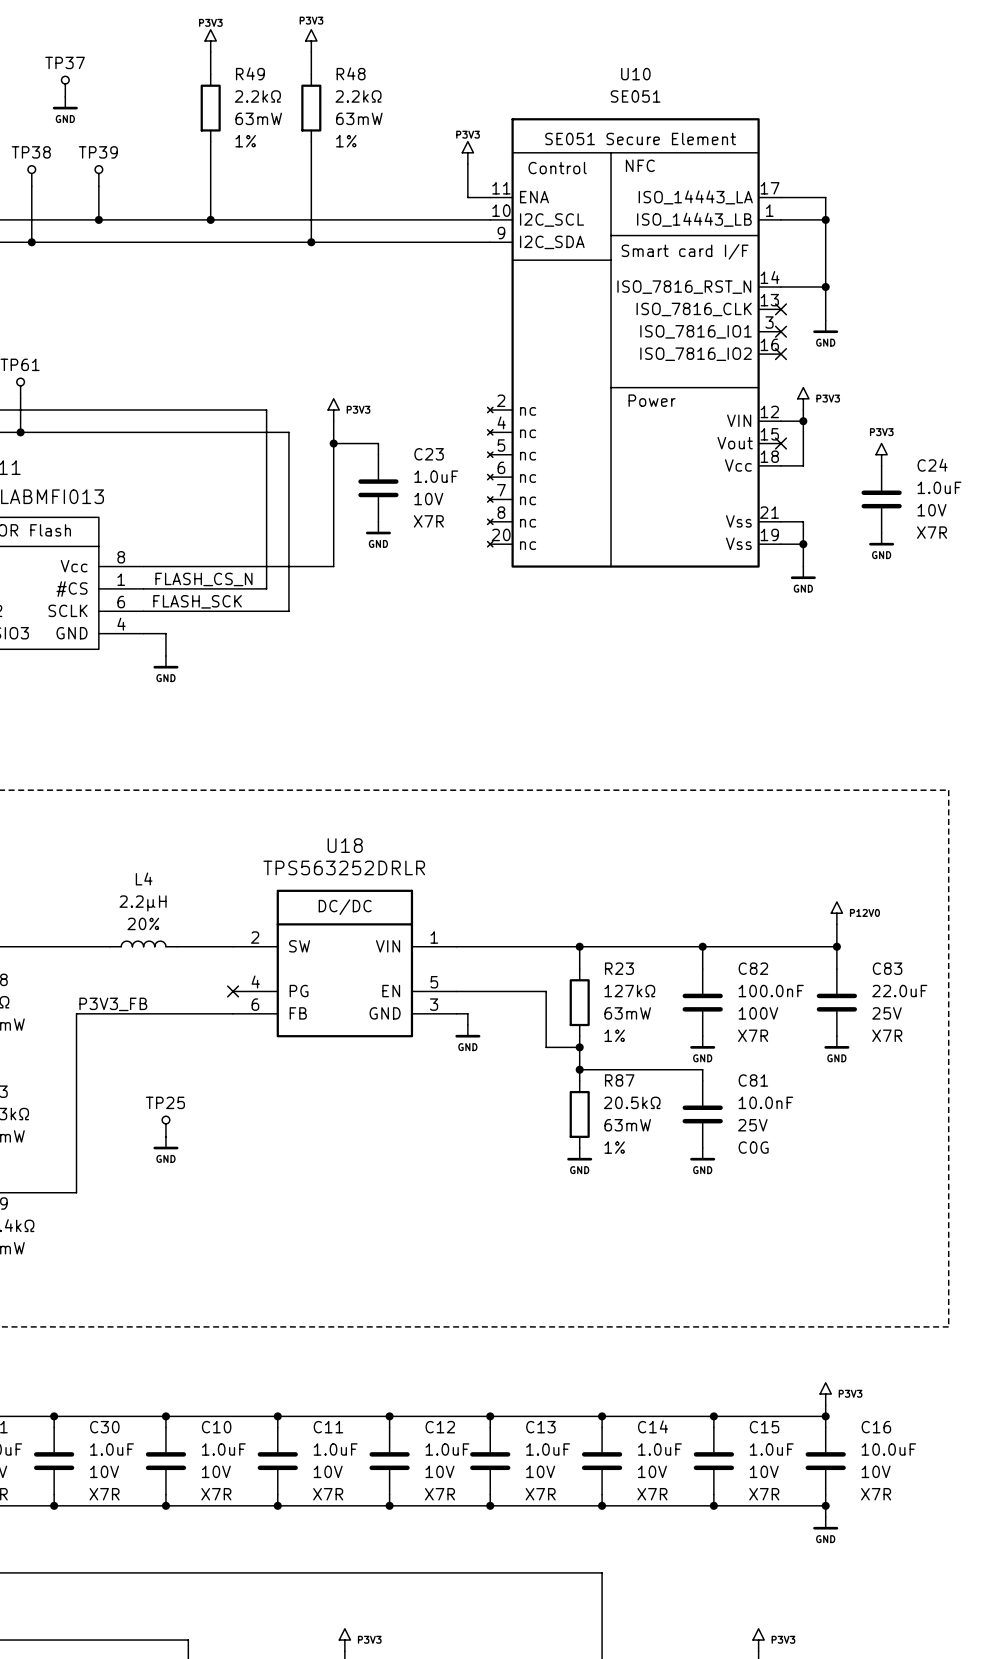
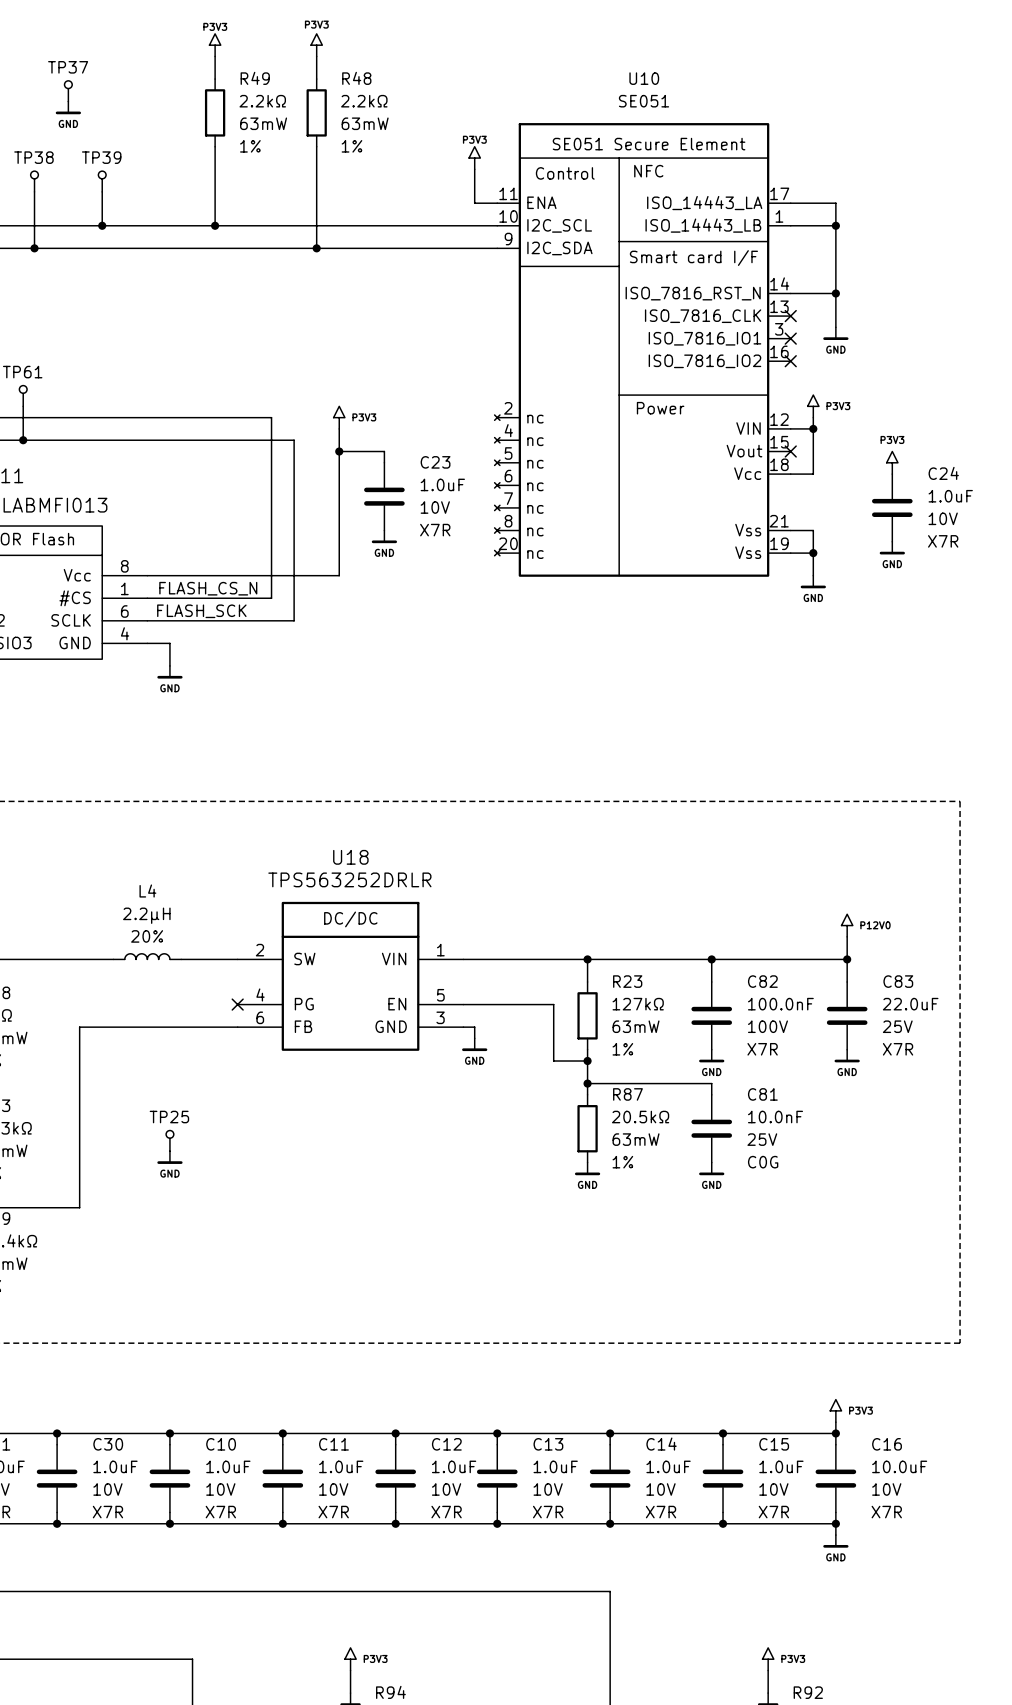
label: P3V3_FB (113, 1004) -> none

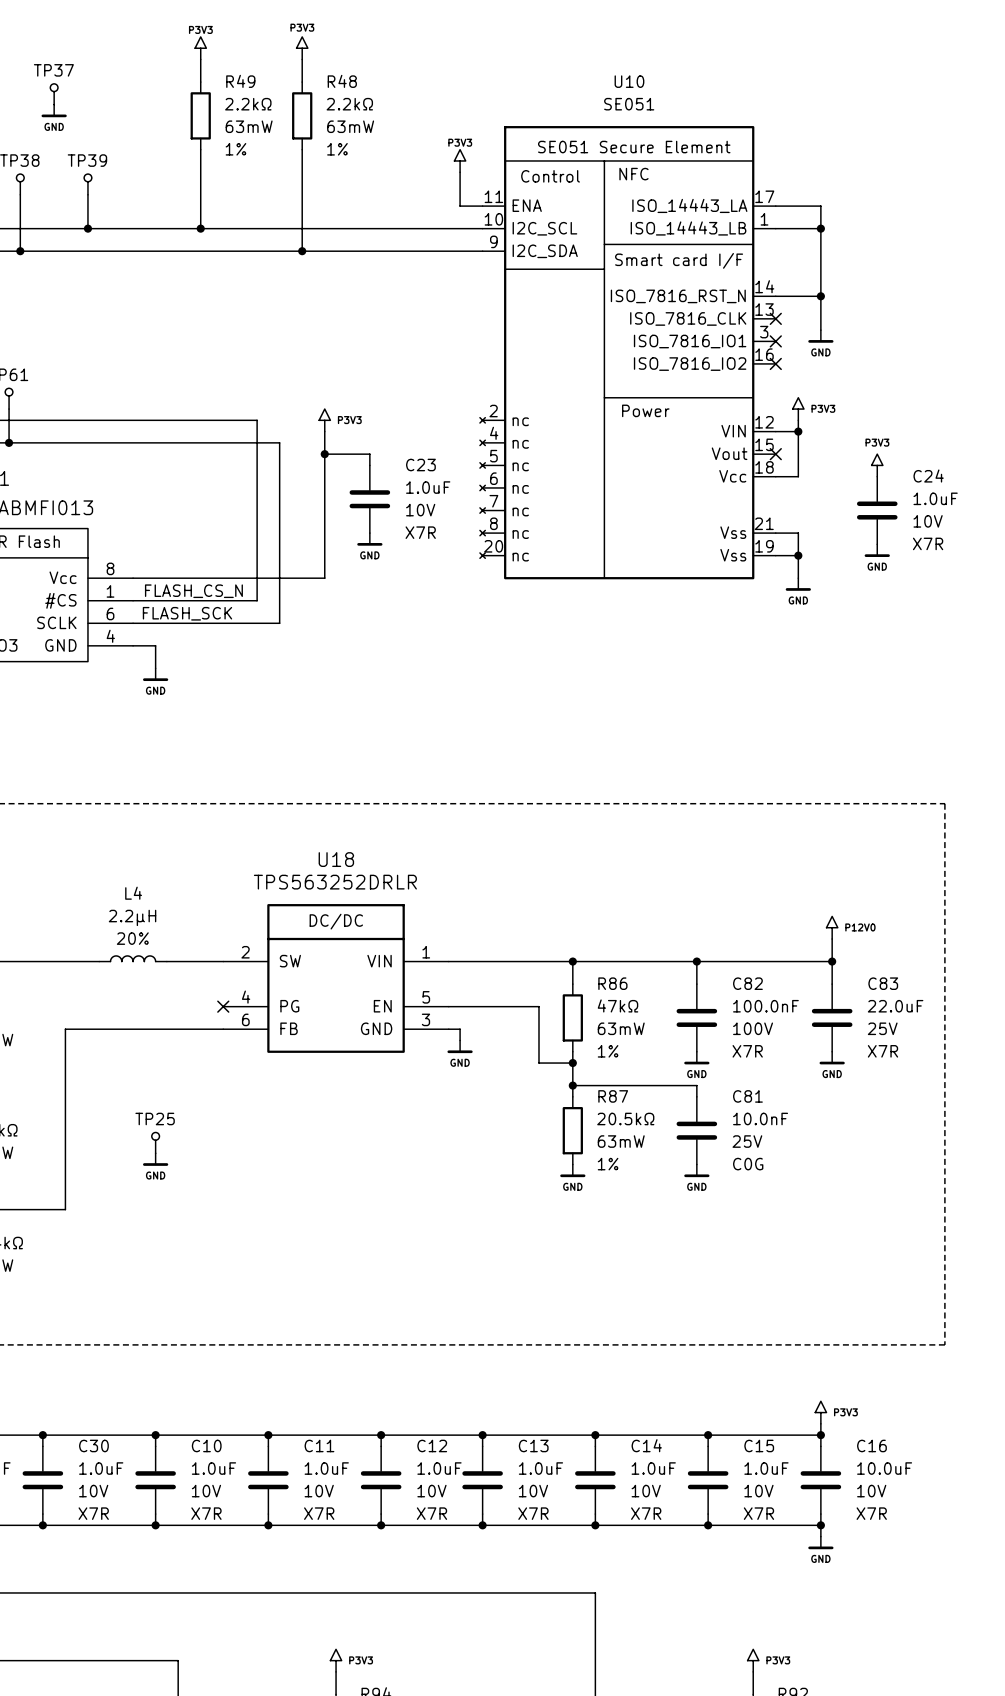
R23 name: R23 (627, 981) -> R86 (612, 983)
R23 value: 127kΩ (638, 1004) -> 47kΩ (618, 1005)

